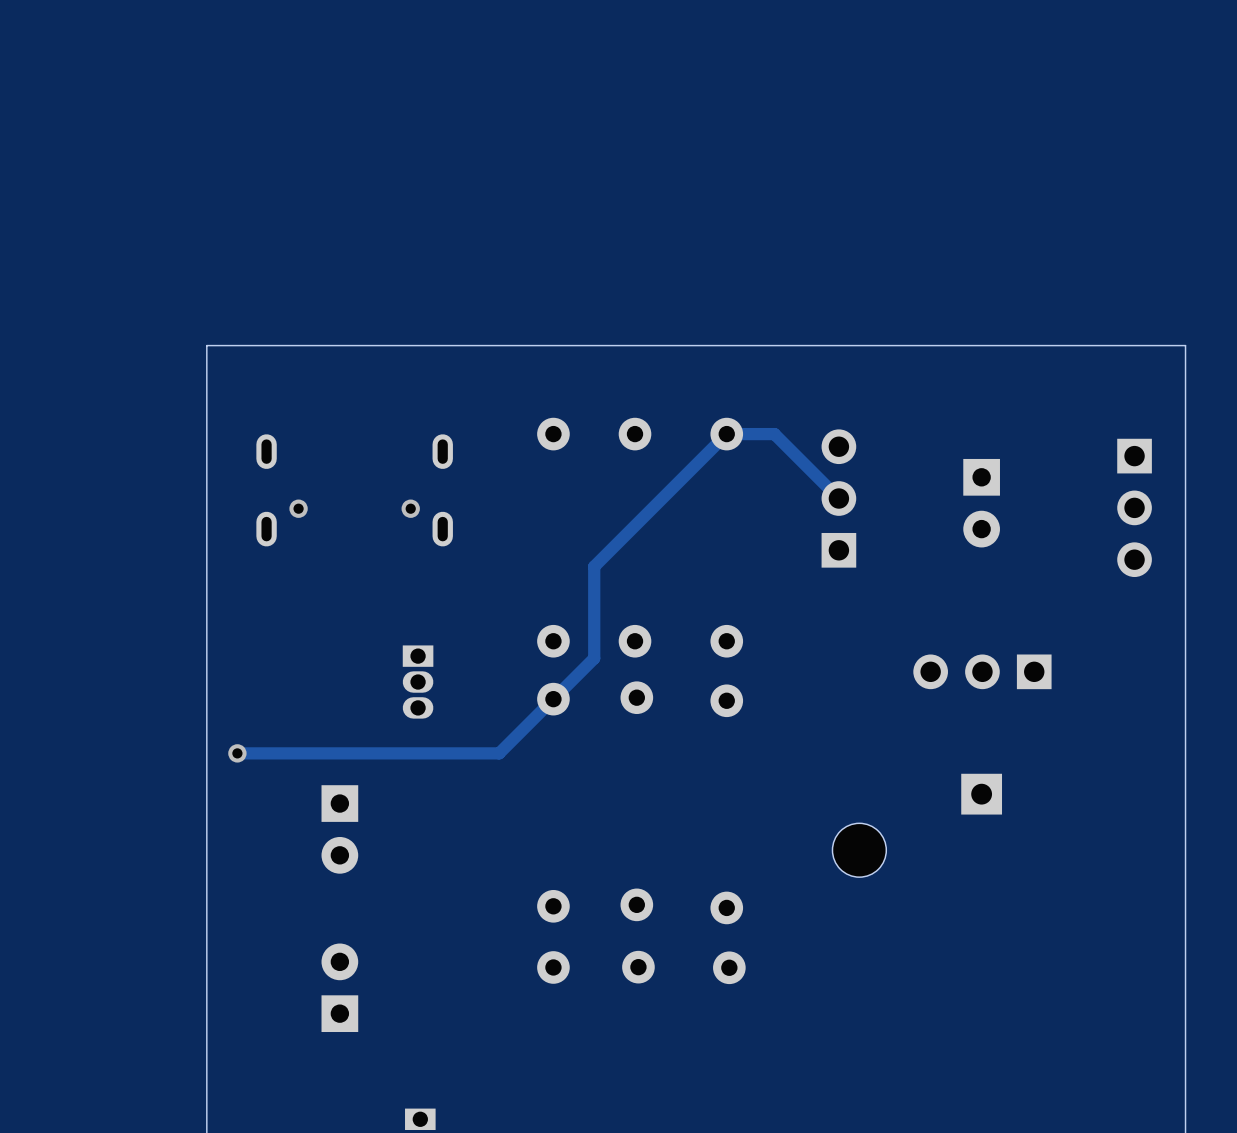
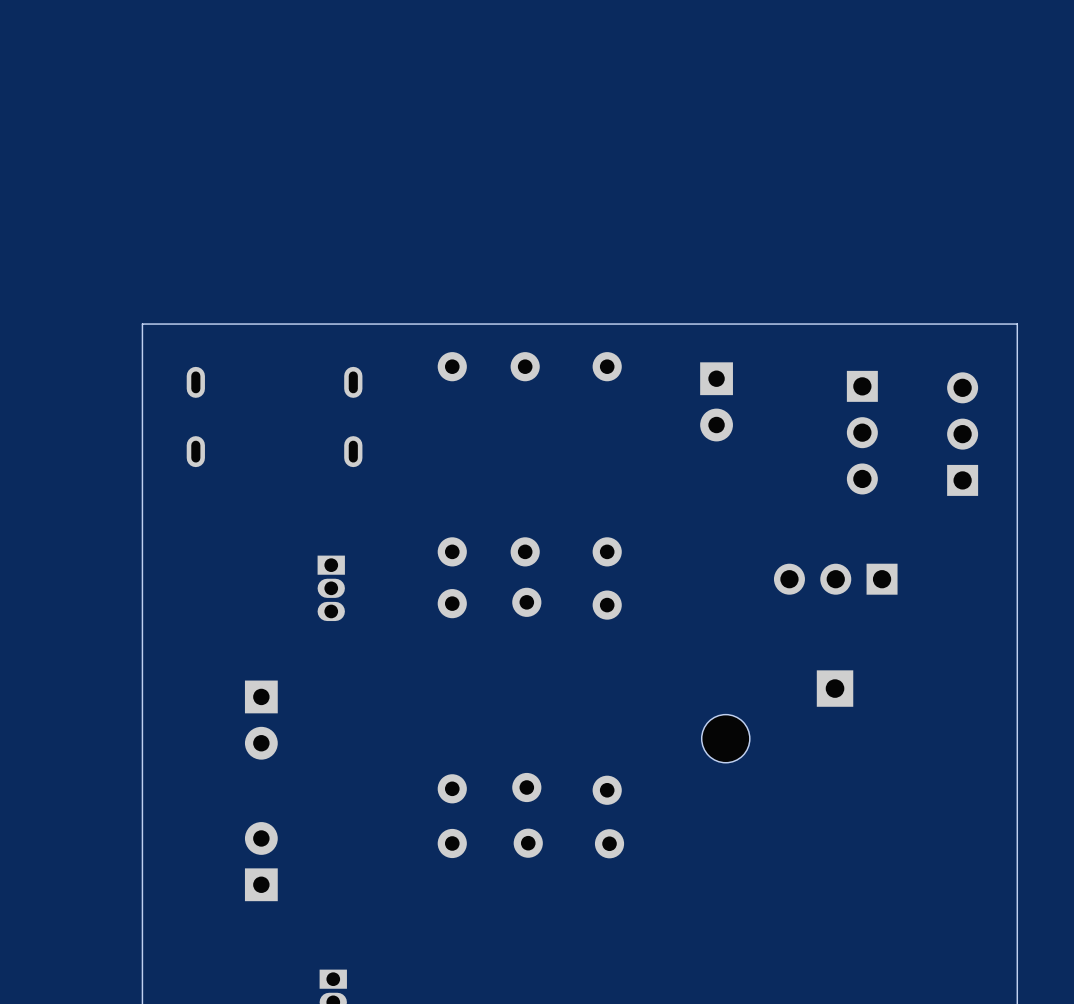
board edge: (1185, 386) (1185, 345) (206, 345) (206, 386) -> (1017, 324) (142, 324)
track: (838, 498) (774, 434) (726, 434) (594, 566) (594, 658) (499, 753) (237, 753) -> none
part rotation: 0° (838, 498) -> 180° (862, 432)
part position: (838, 498) -> (862, 432)
part position: (981, 503) -> (716, 401)
part rotation: 0° (1134, 507) -> 180° (962, 434)
via: (298, 508) -> none
via: (410, 508) -> none
via: (237, 753) -> none

